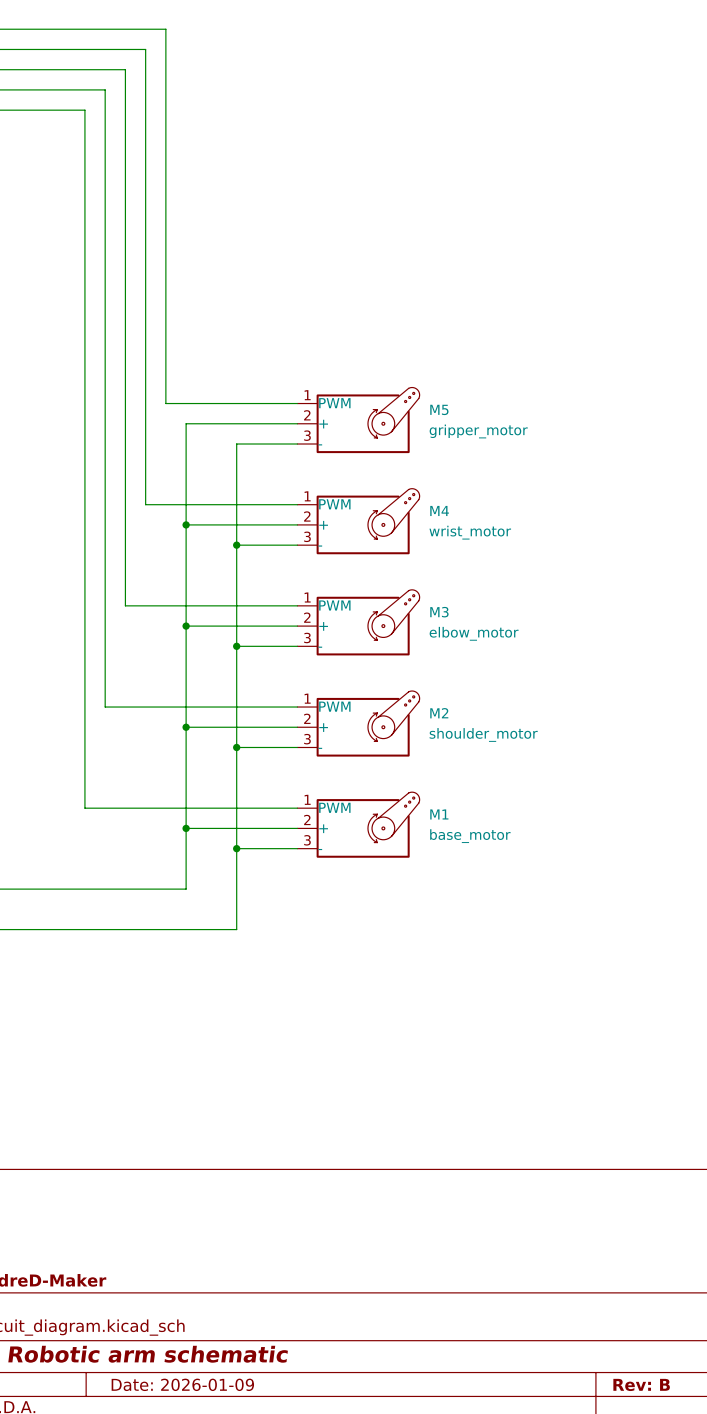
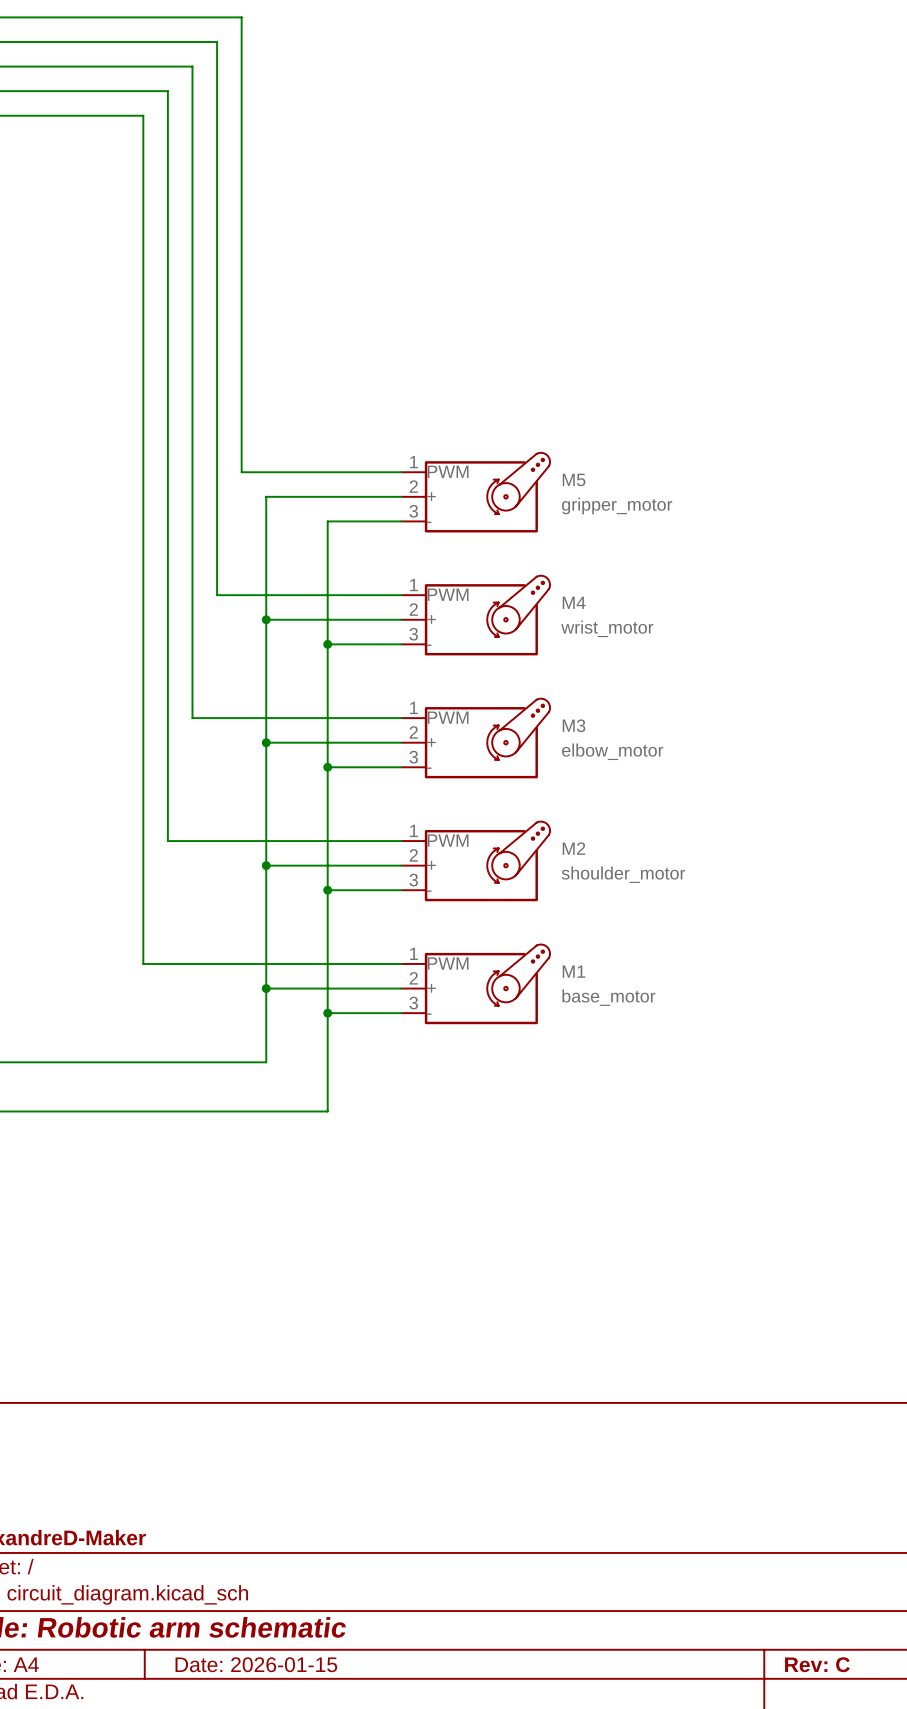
title block: Date: 2026-01-09 (182, 1384) -> Date: 2026-01-15 (256, 1664)
title block: Rev: B (641, 1384) -> Rev: C (817, 1664)

